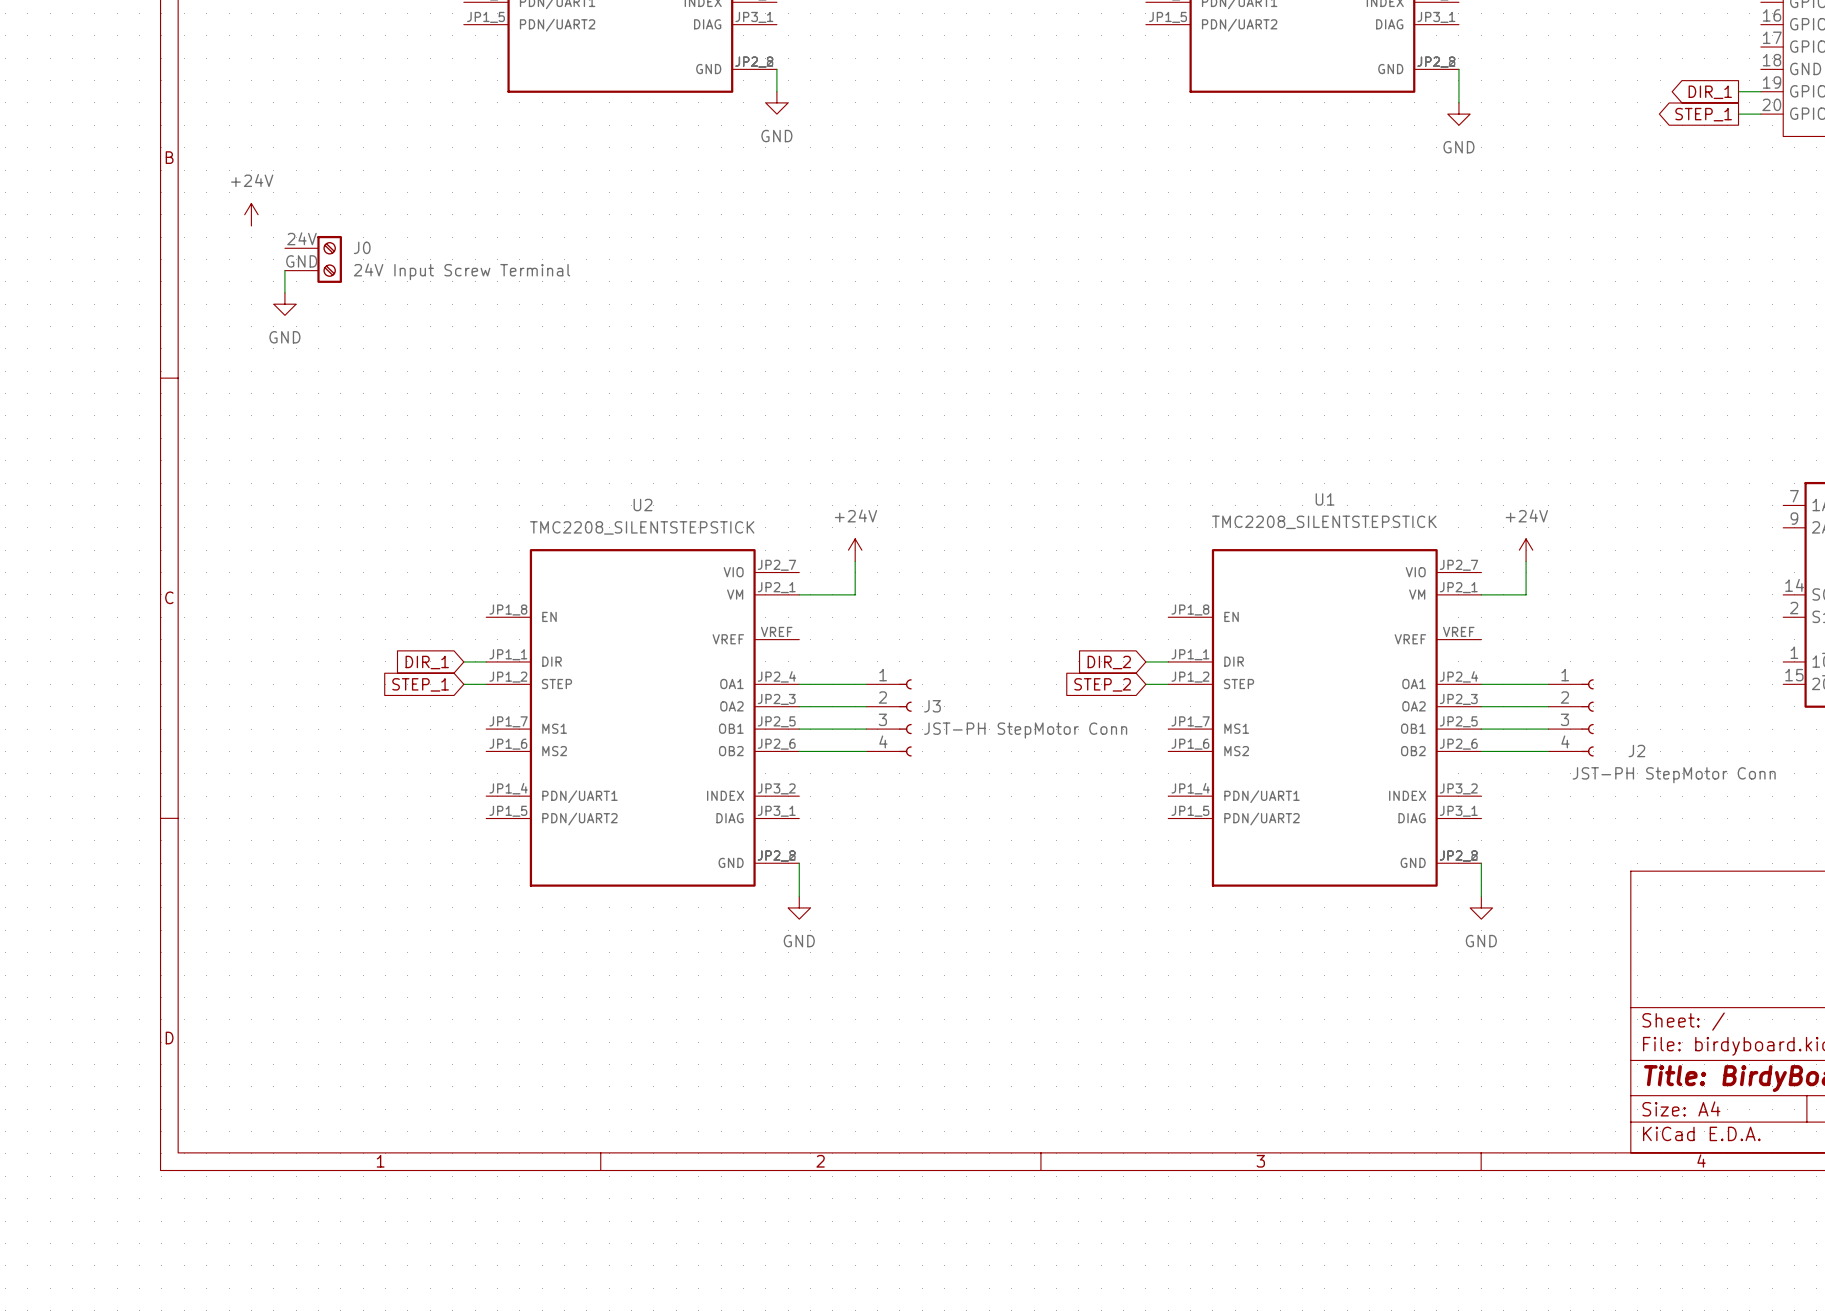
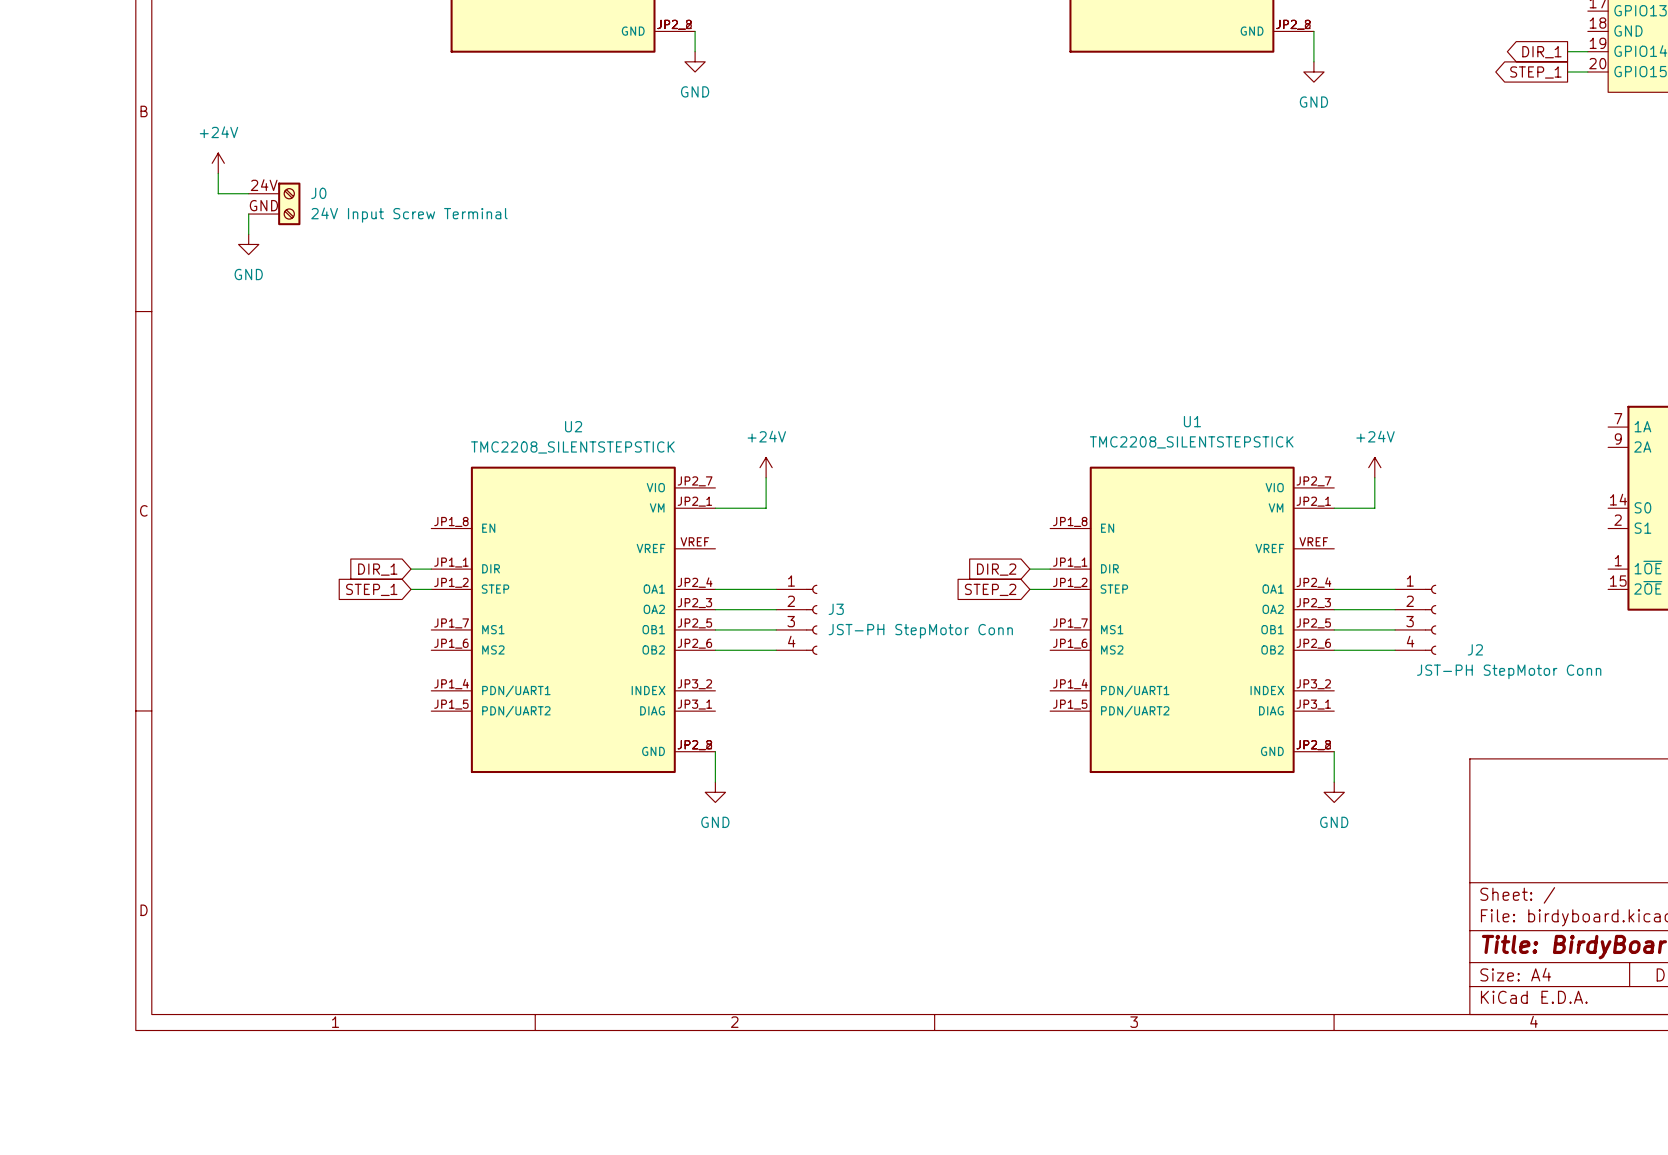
wire: none -> (218, 173) (218, 193) (248, 193)

